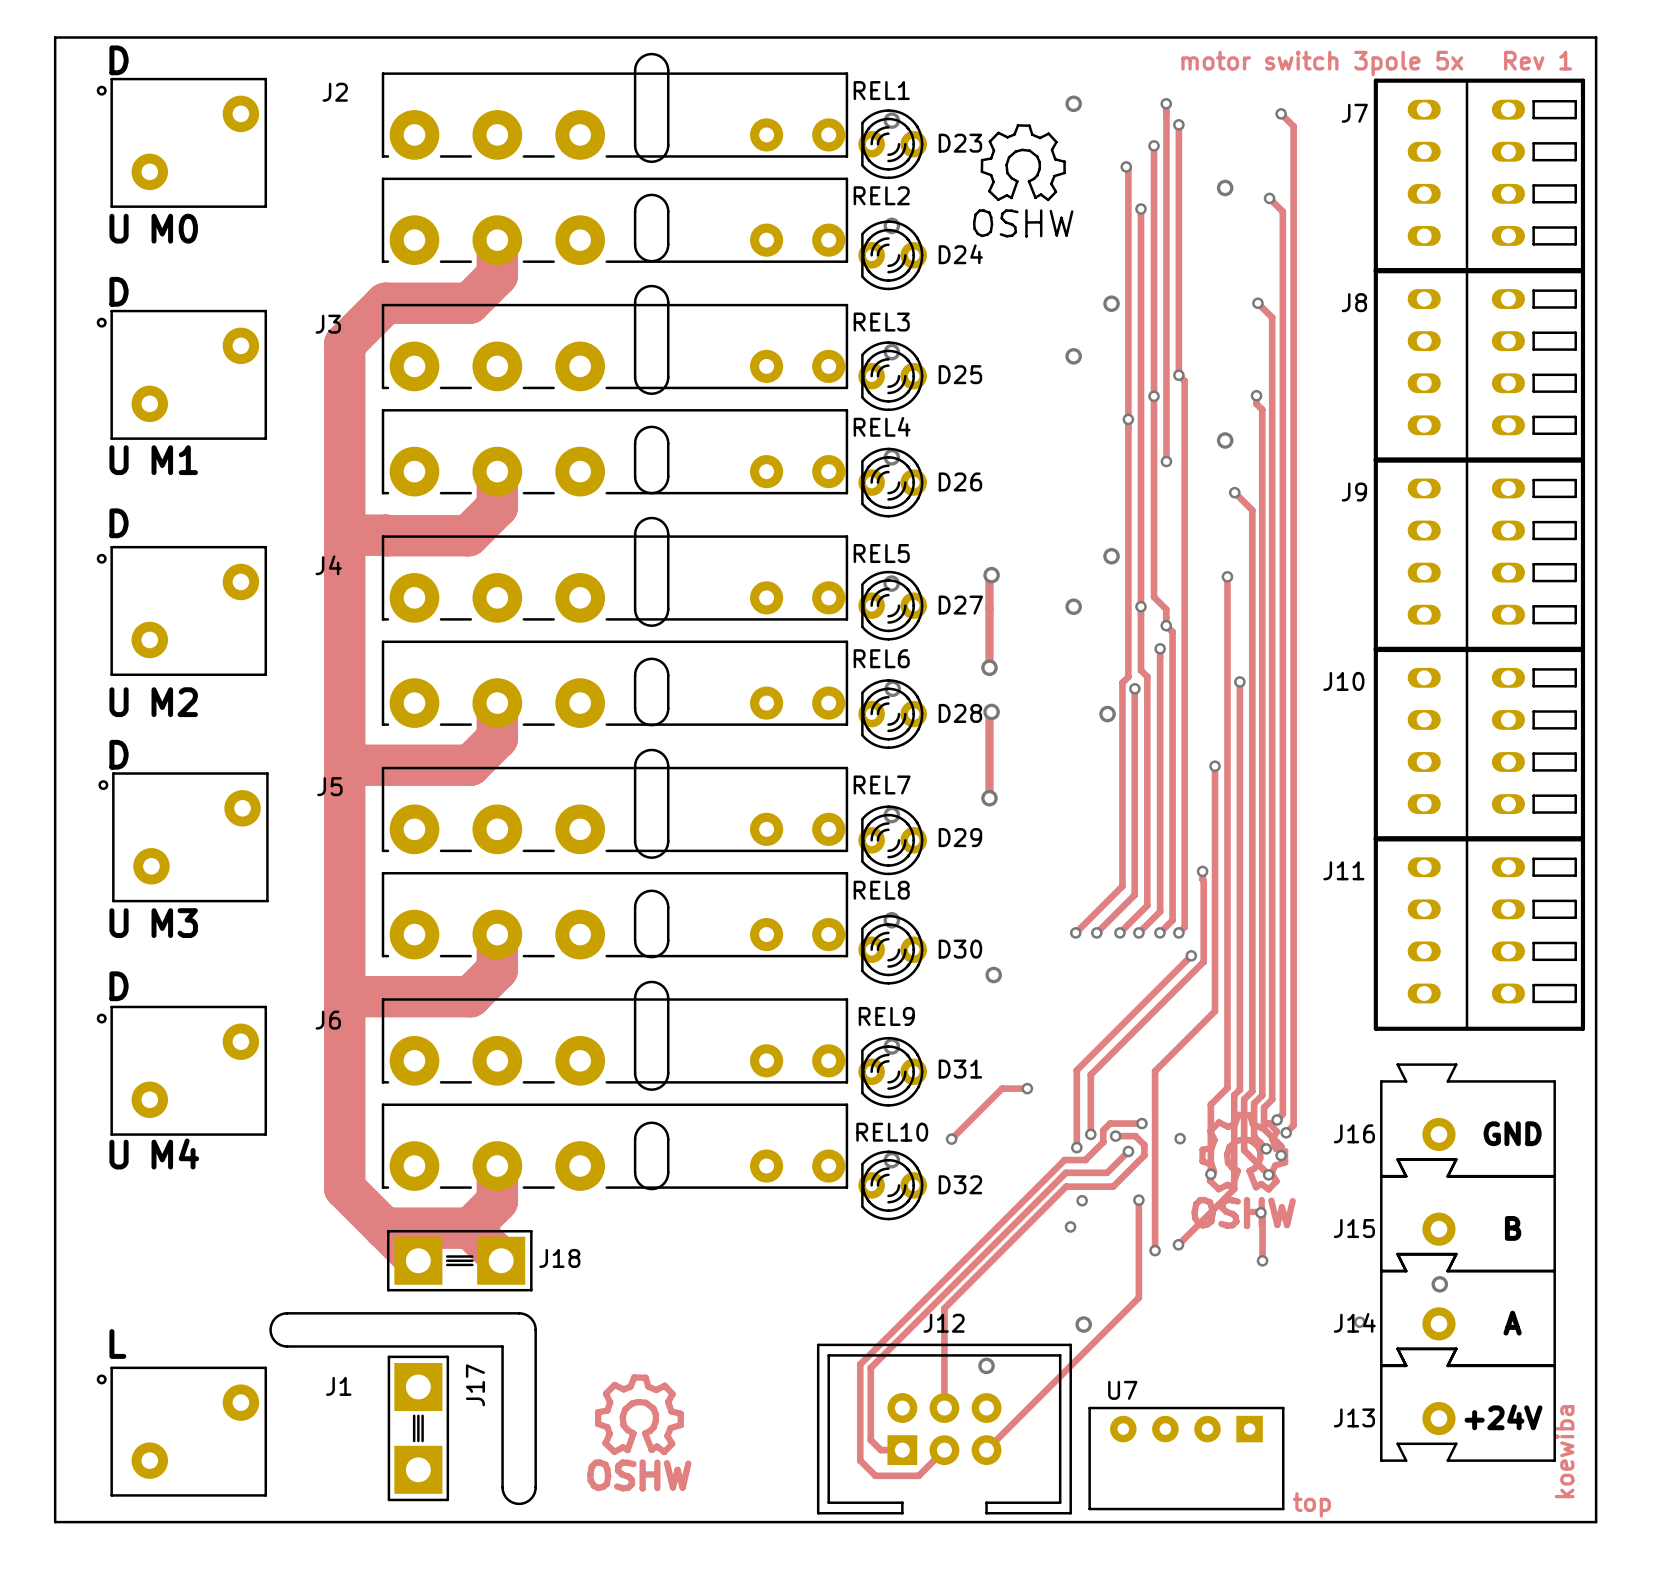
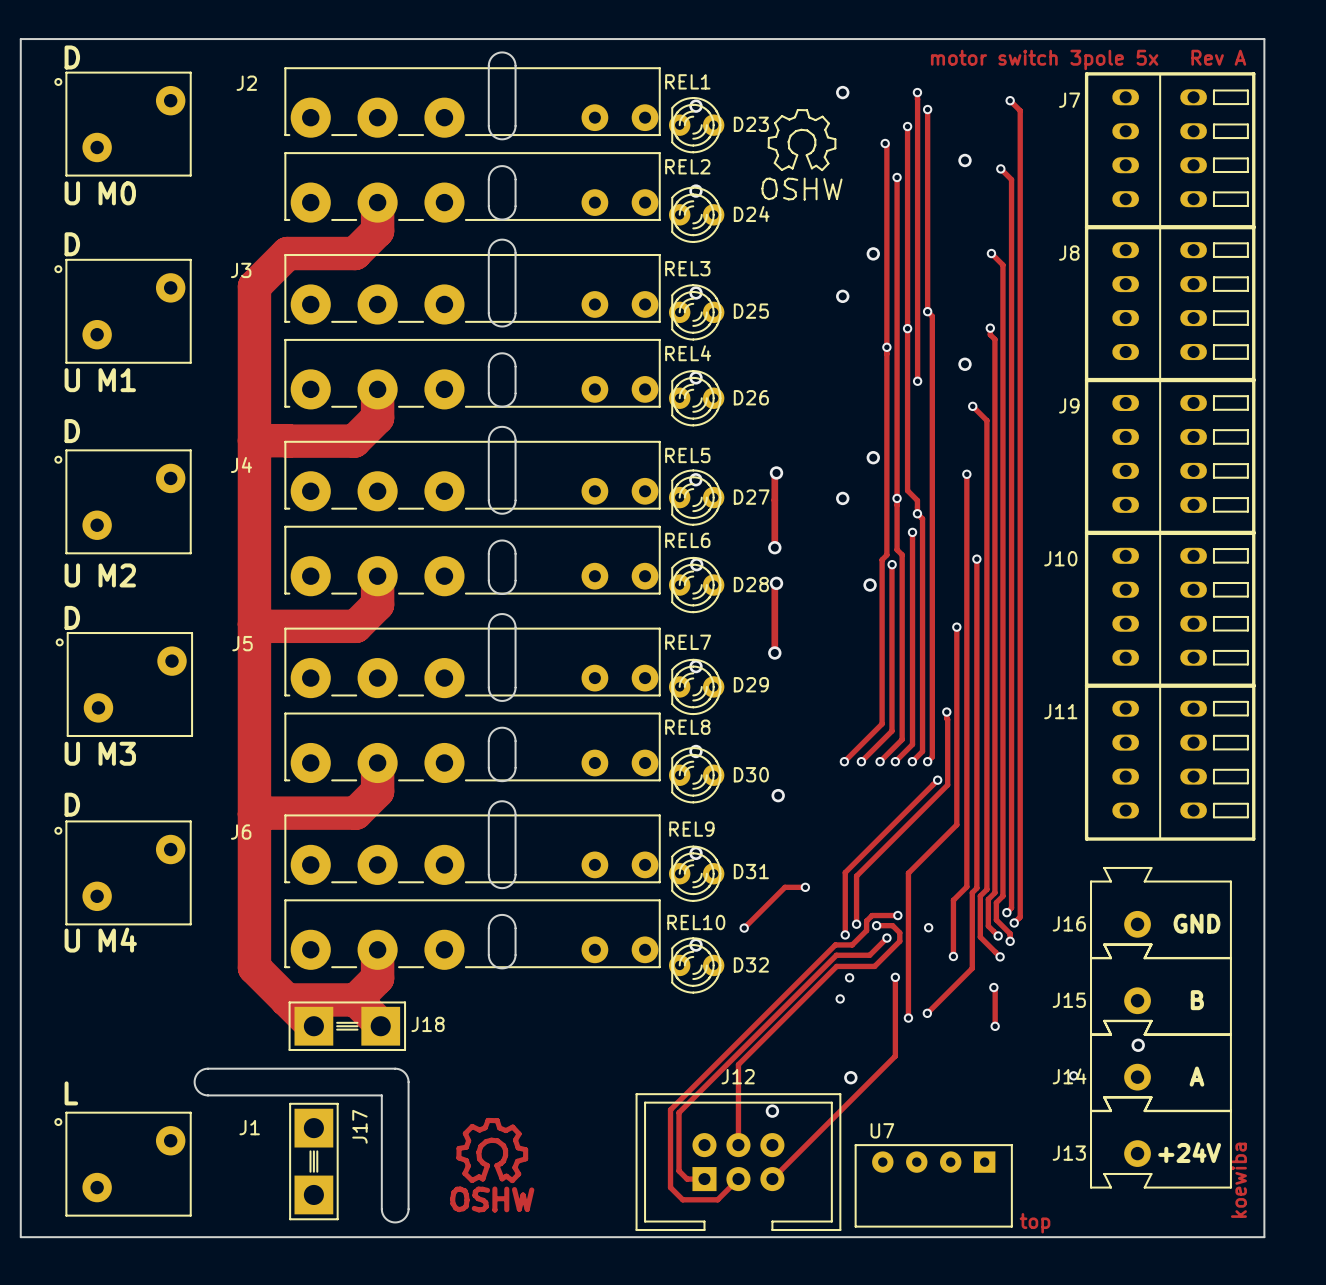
text: motor switch 3pole 5x Rev 1 (1376, 63) -> motor switch 3pole 5x Rev A (1088, 59)
drawing: [1191, 1111, 1296, 1230] -> none

